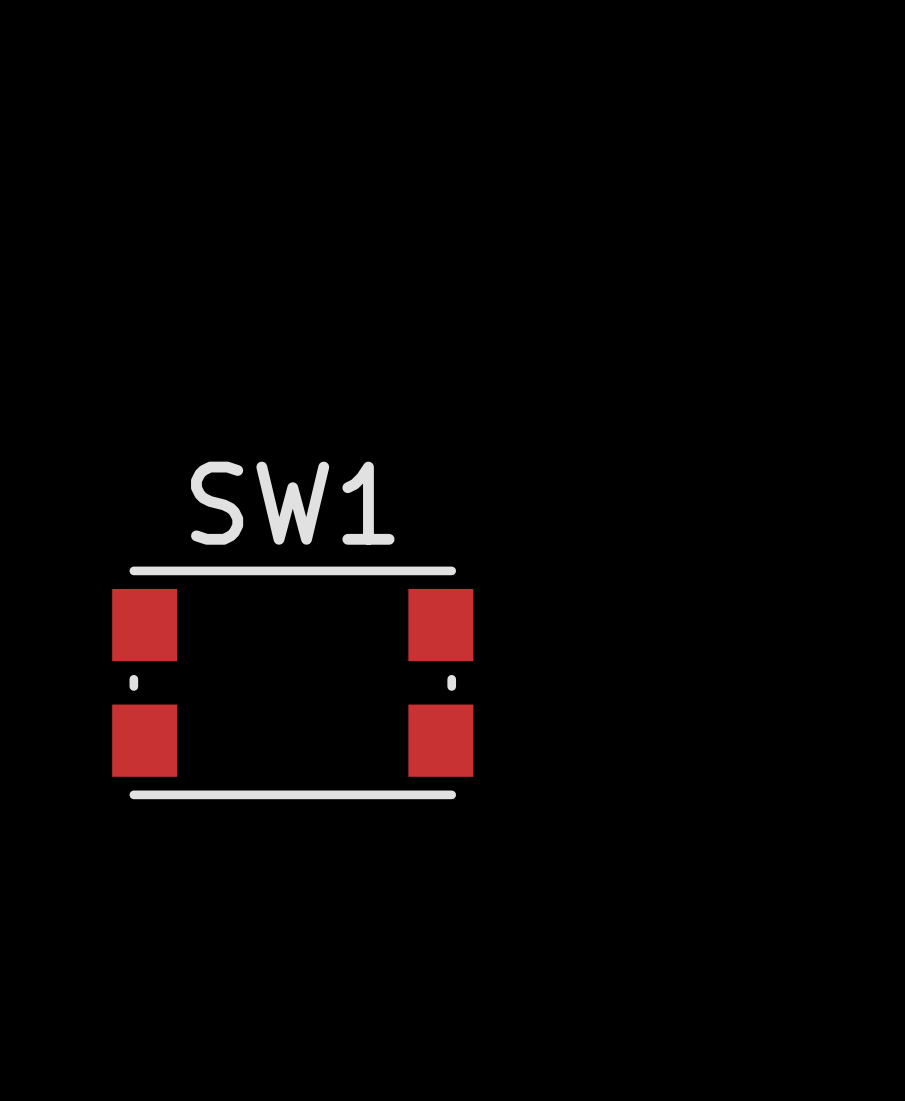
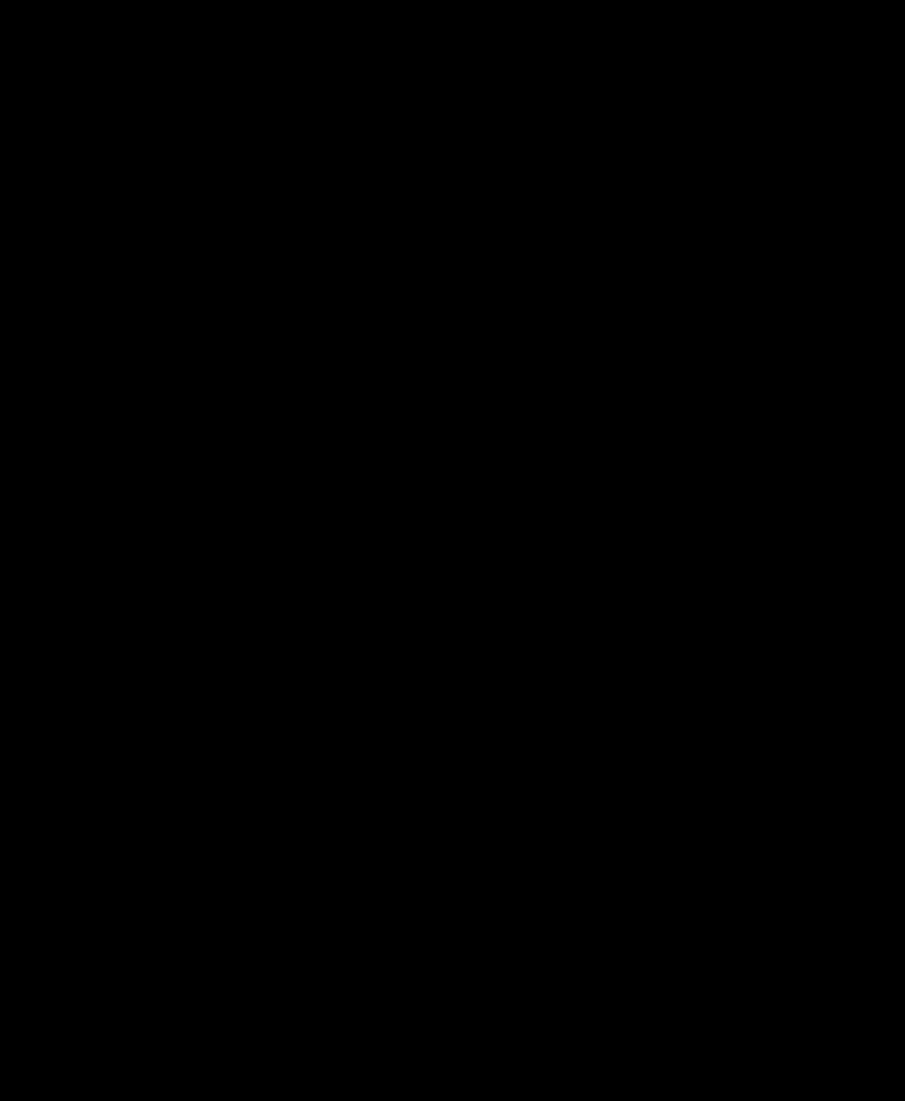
SW1: (292, 682) -> none

